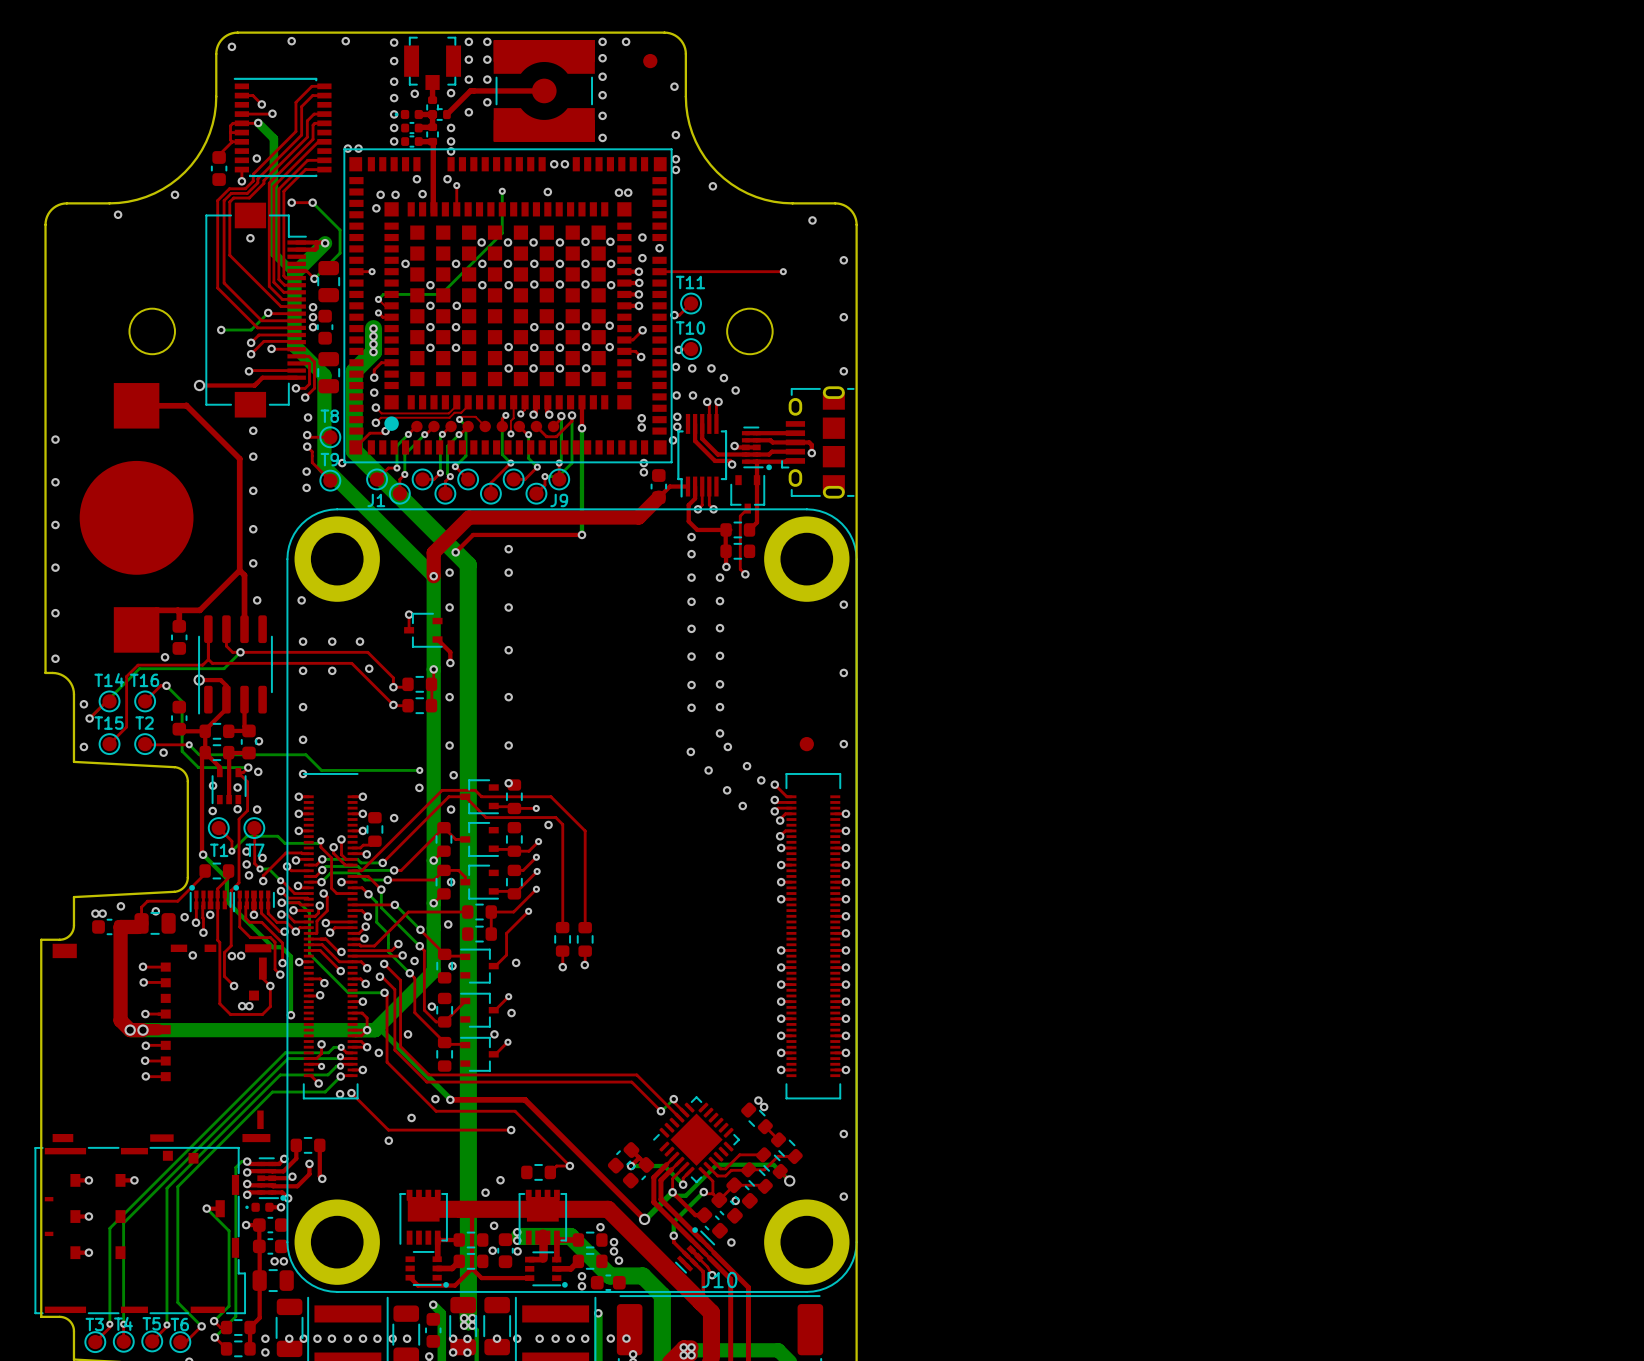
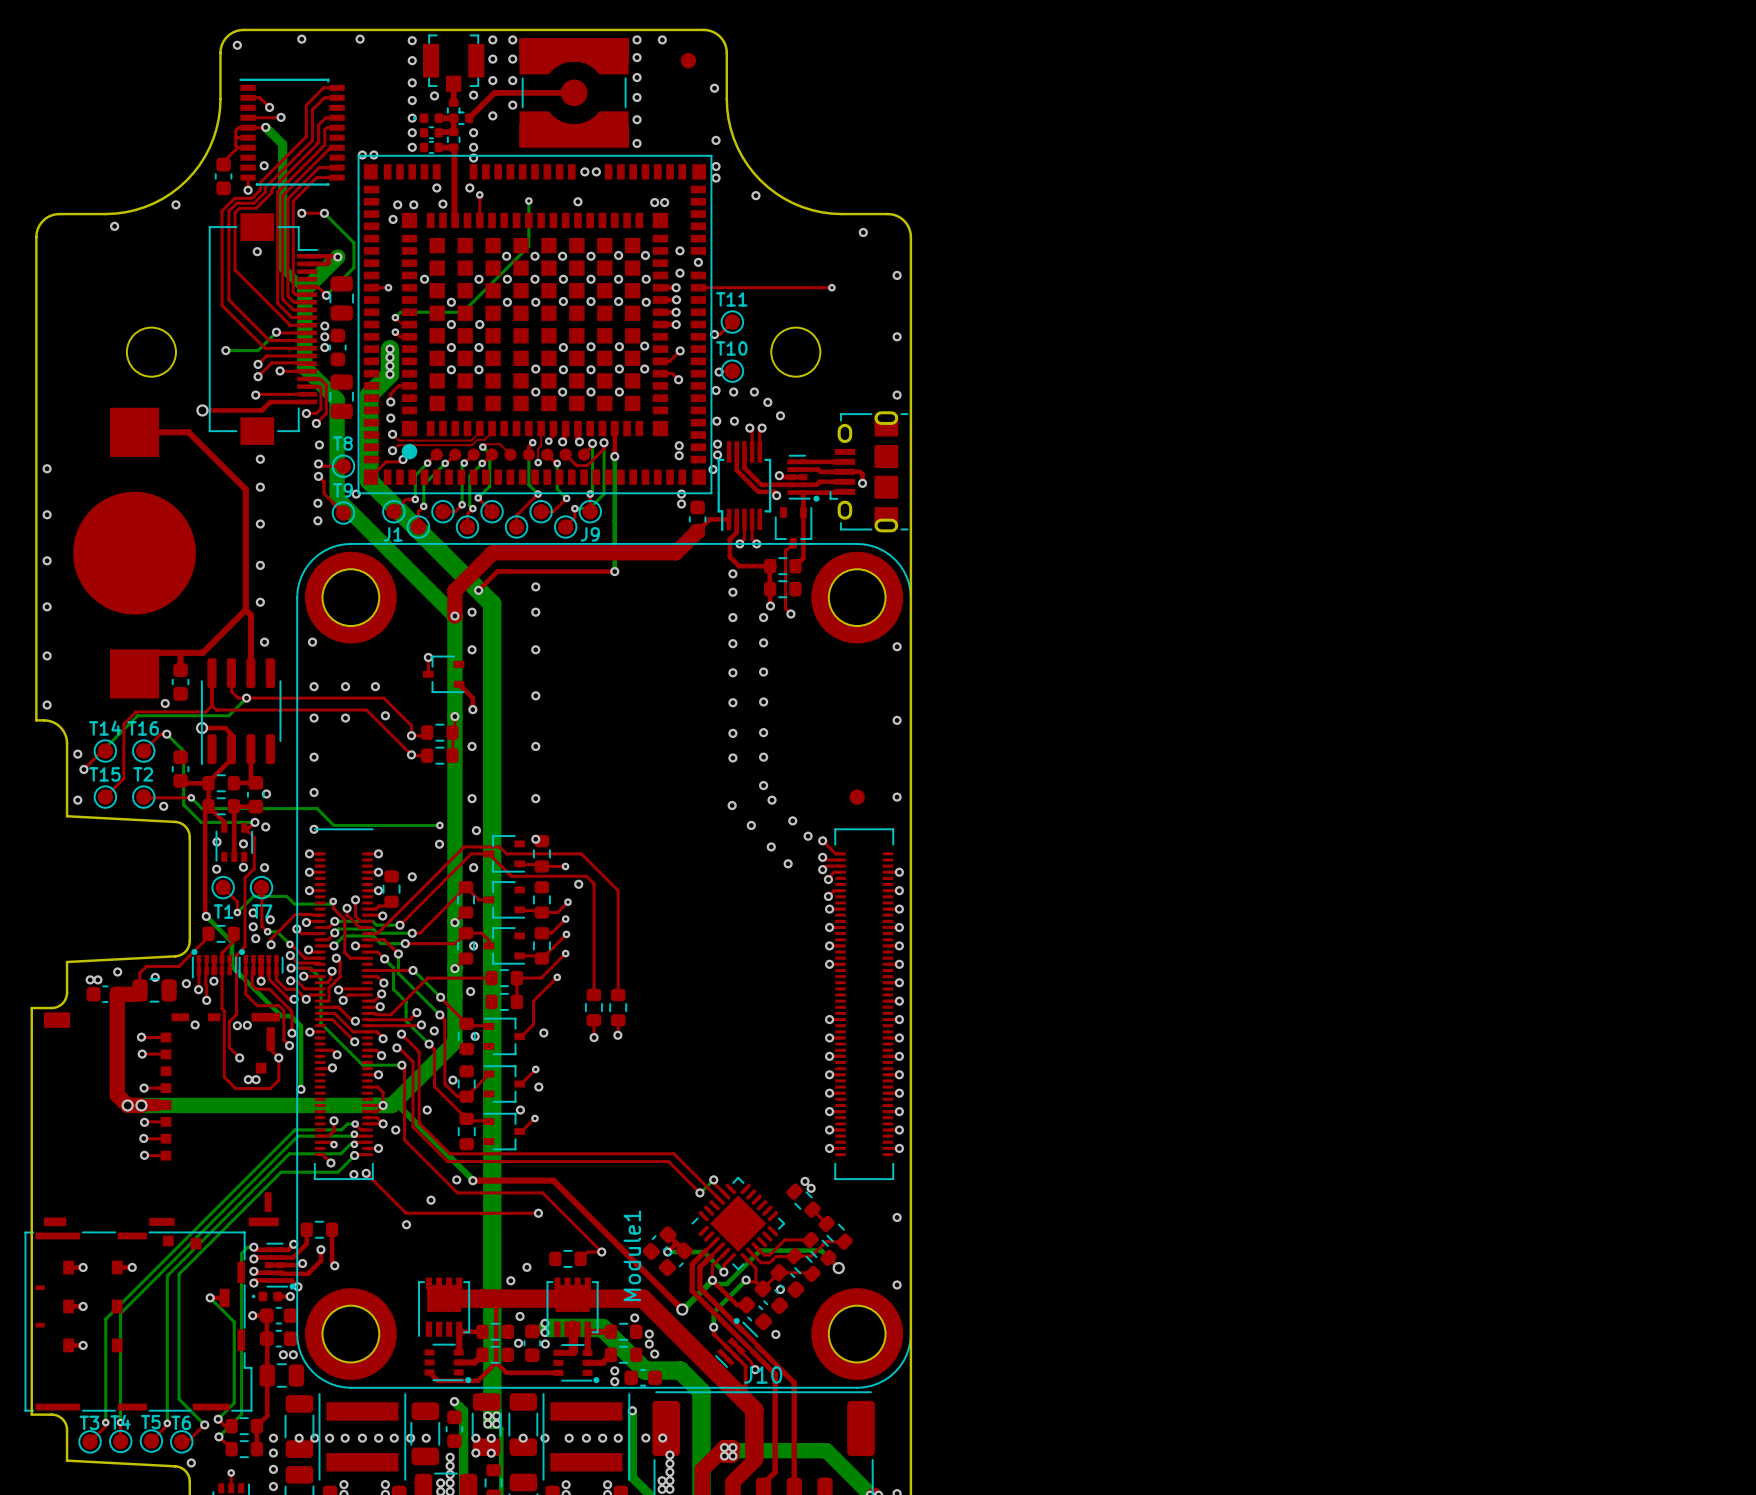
part footprint: [294, 516, 380, 602] -> [305, 551, 397, 644]
part footprint: [764, 516, 850, 602] -> [811, 551, 904, 644]
Module1 name: none -> Module1 (632, 1255)
part footprint: [294, 1199, 380, 1285] -> [305, 1288, 397, 1380]
part footprint: [764, 1199, 850, 1285] -> [811, 1288, 904, 1380]

